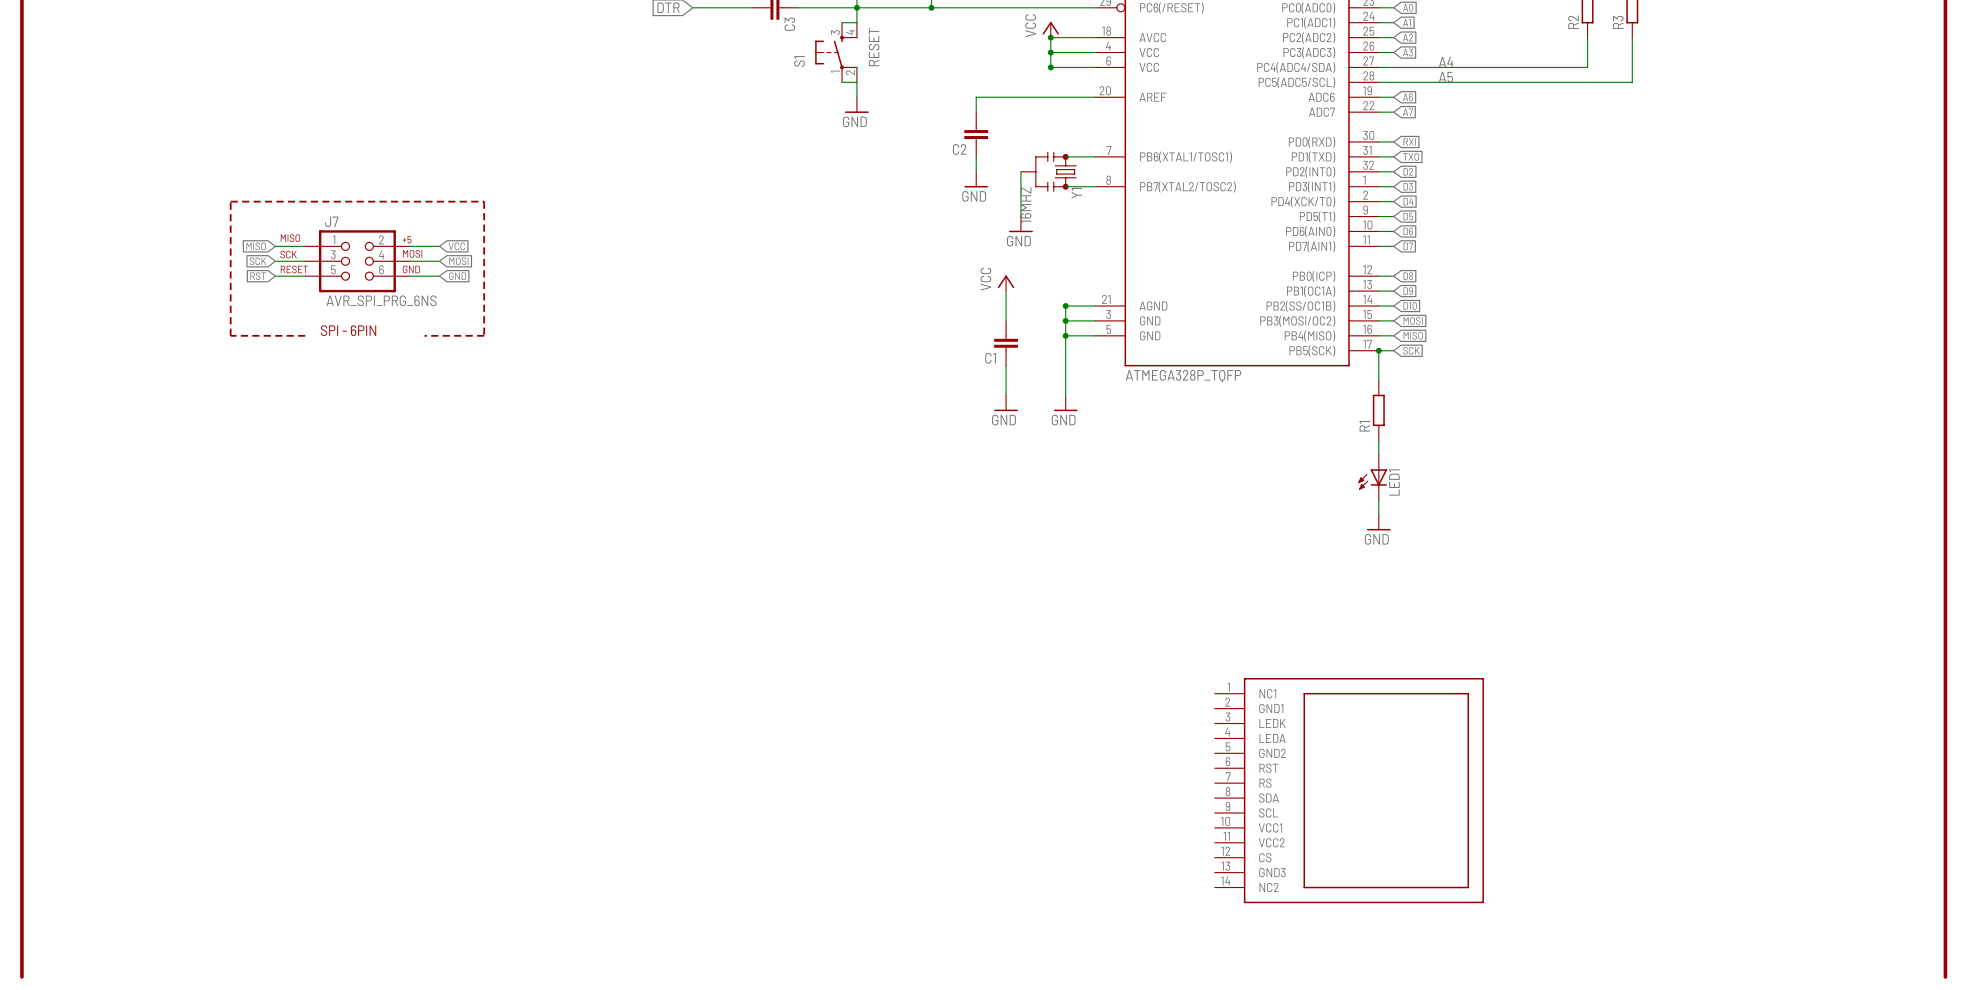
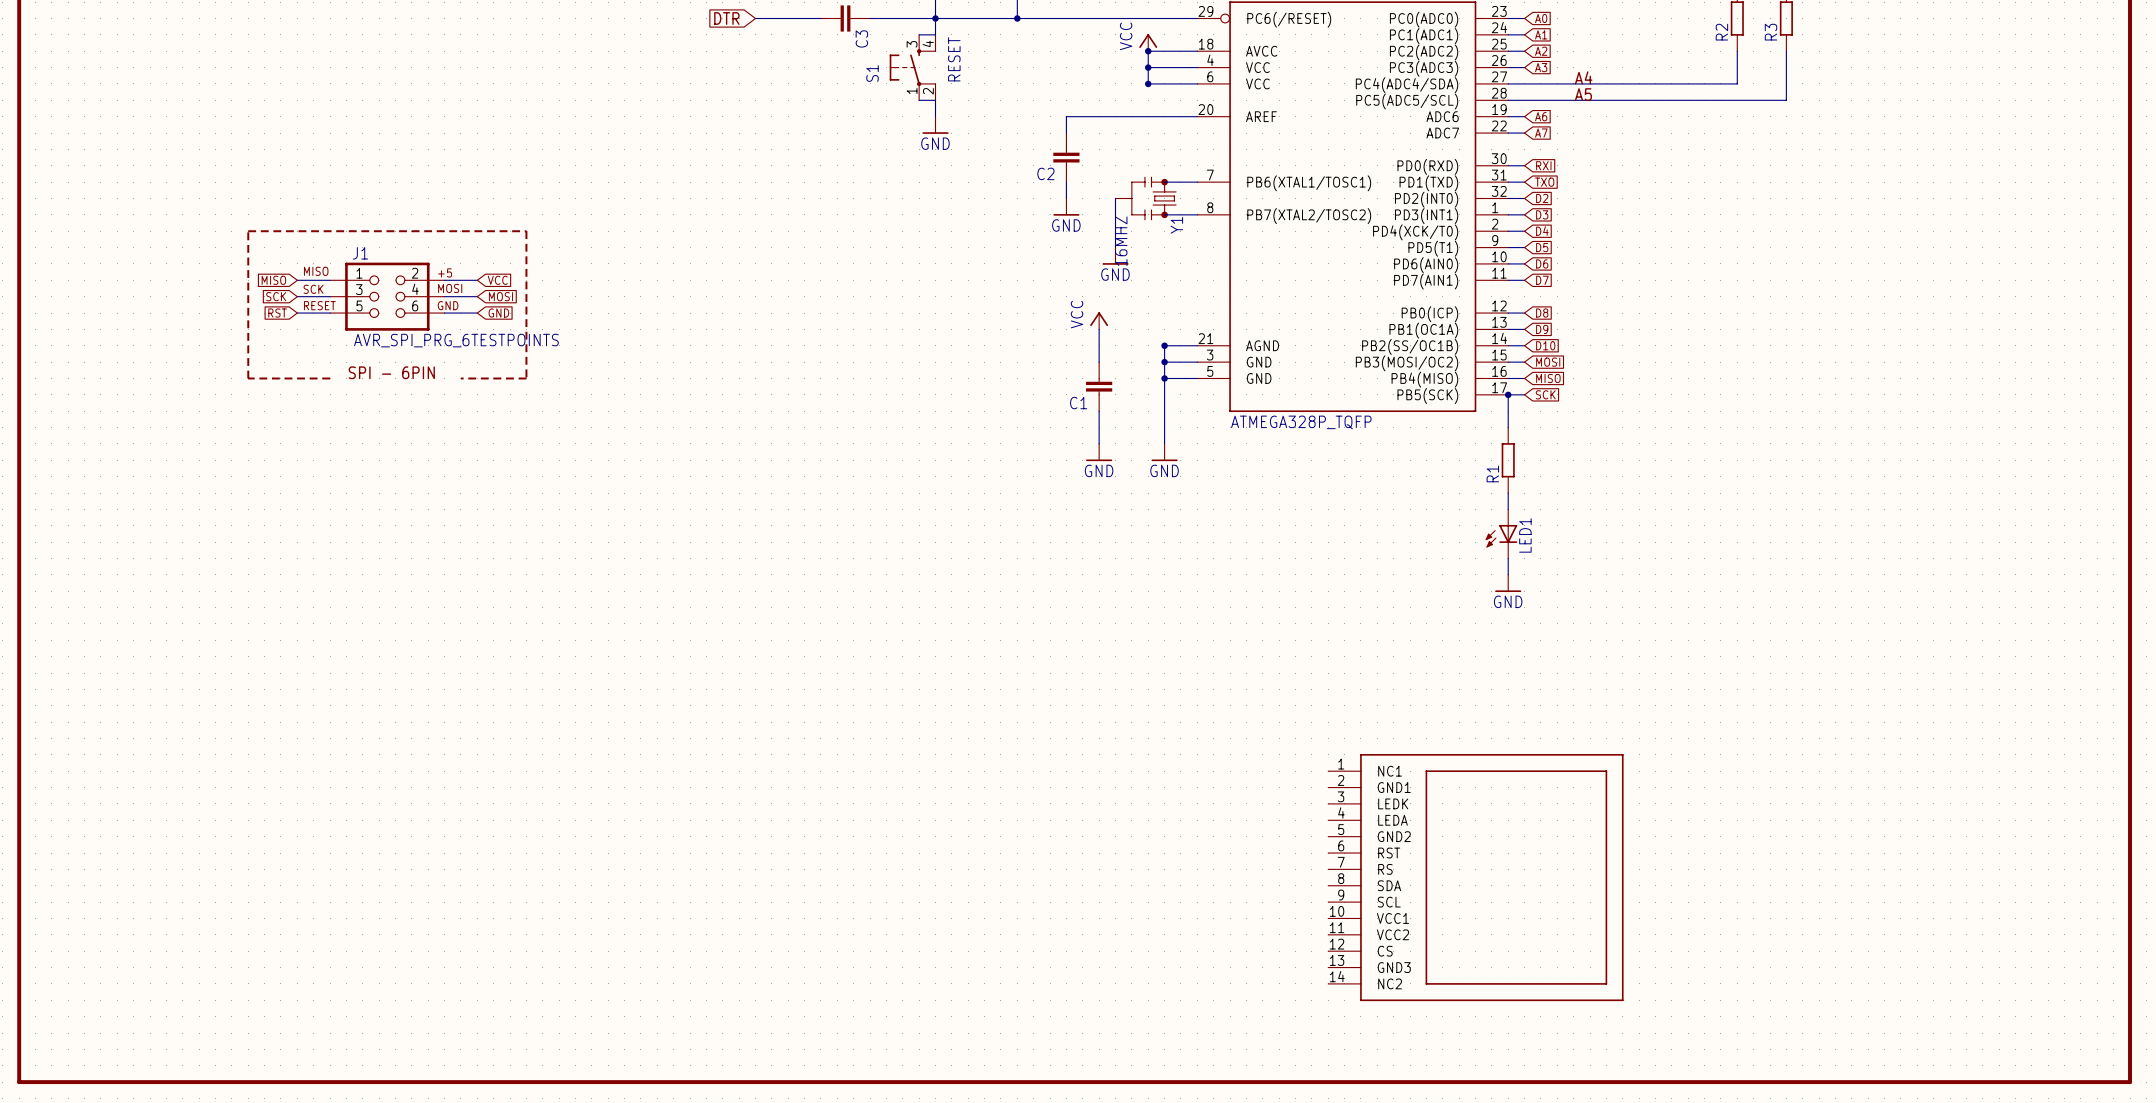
J7 name: J7 (331, 221) -> J1 (360, 253)
J7 value: AVR_SPI_PRG_6NS (381, 300) -> AVR_SPI_PRG_6TESTPOINTS (456, 340)
line: none -> (19, 1082) (2130, 1082)

